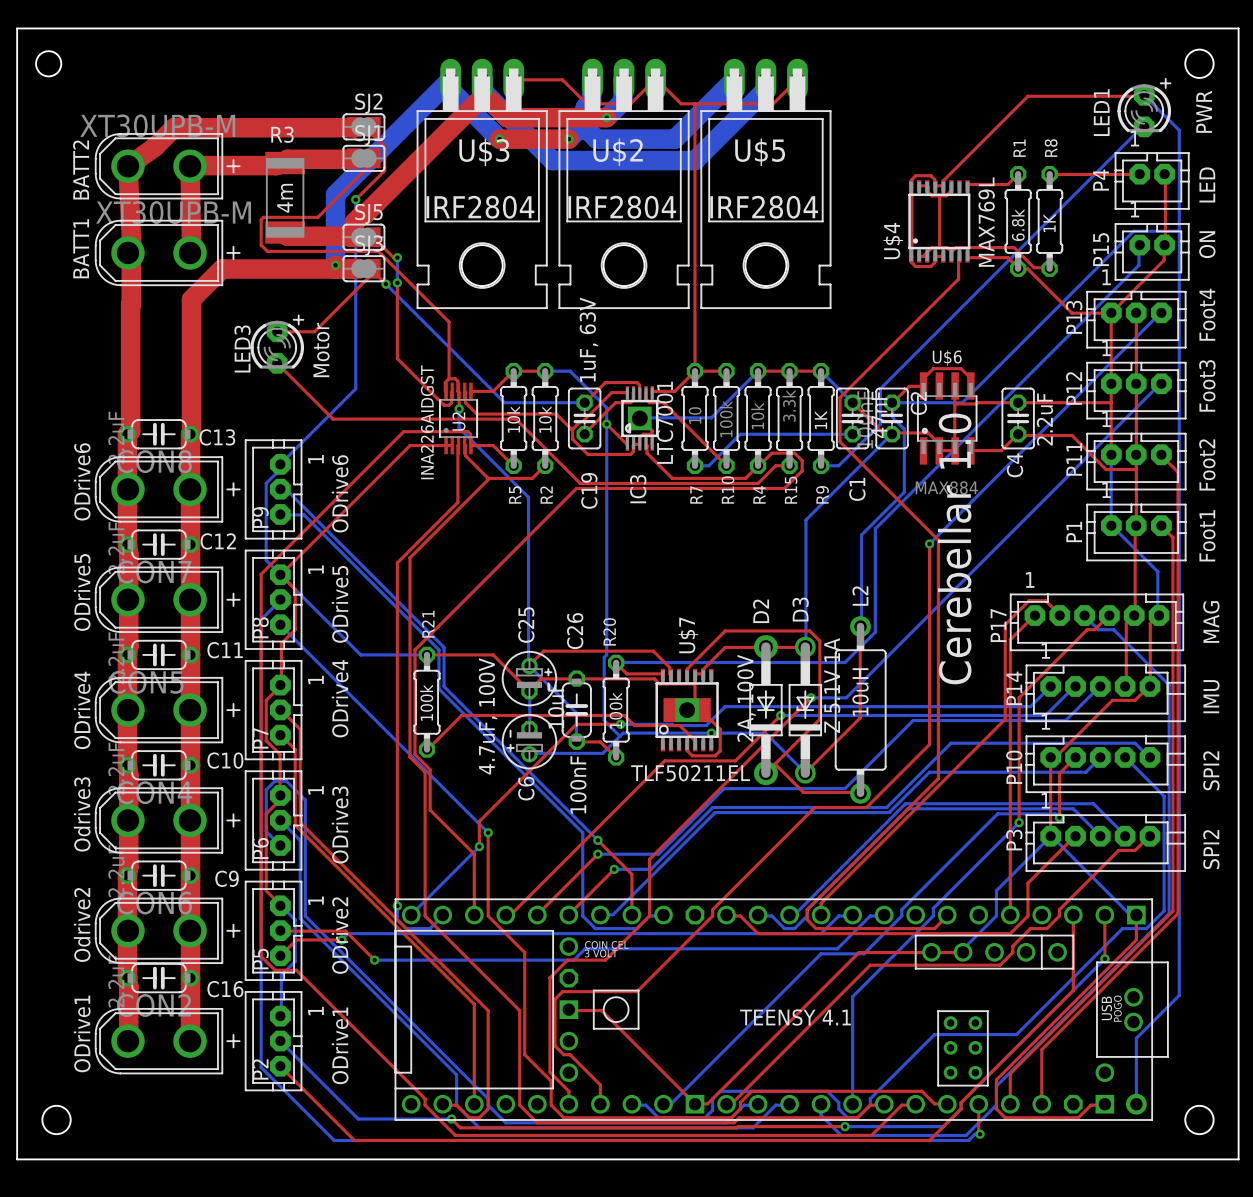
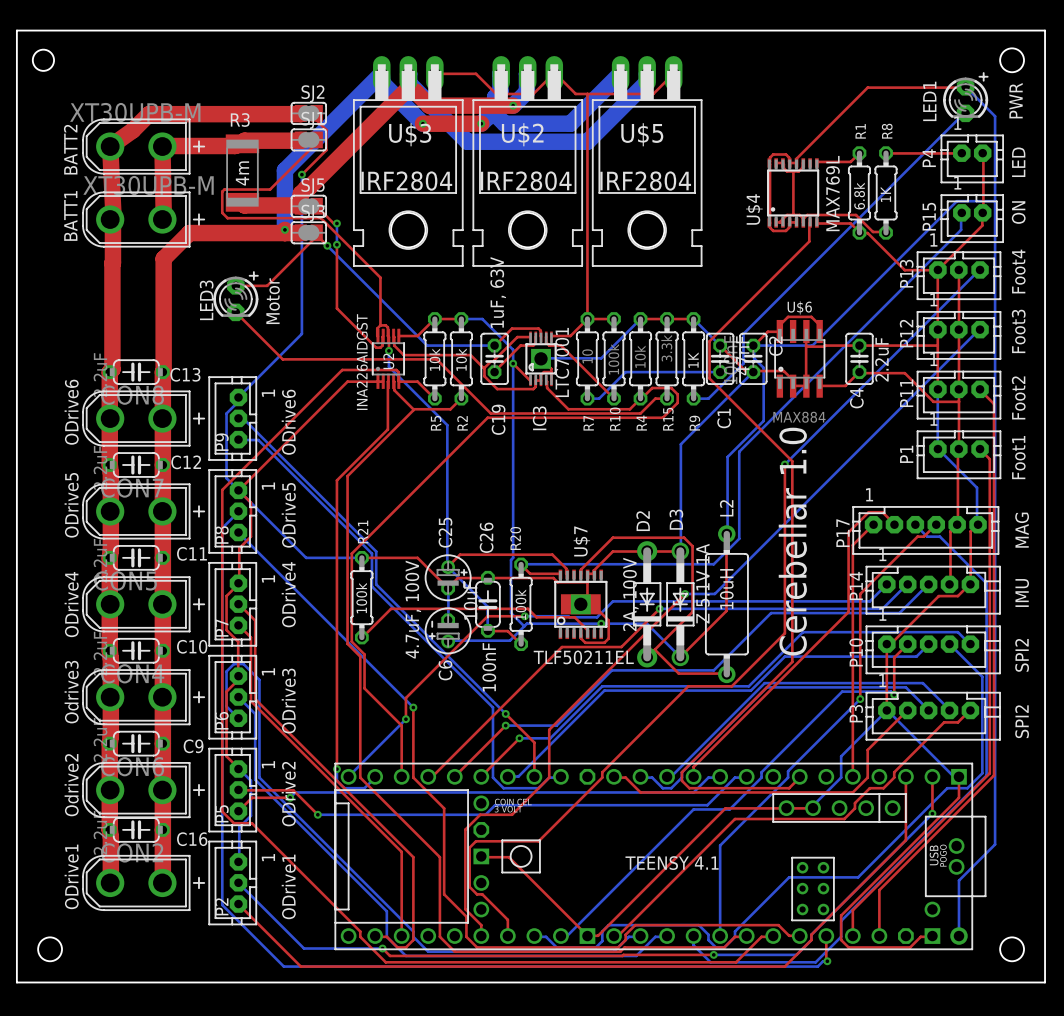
text position: Cerebellar 1.0 (954, 548) -> Cerebellar 1.0 (792, 541)

